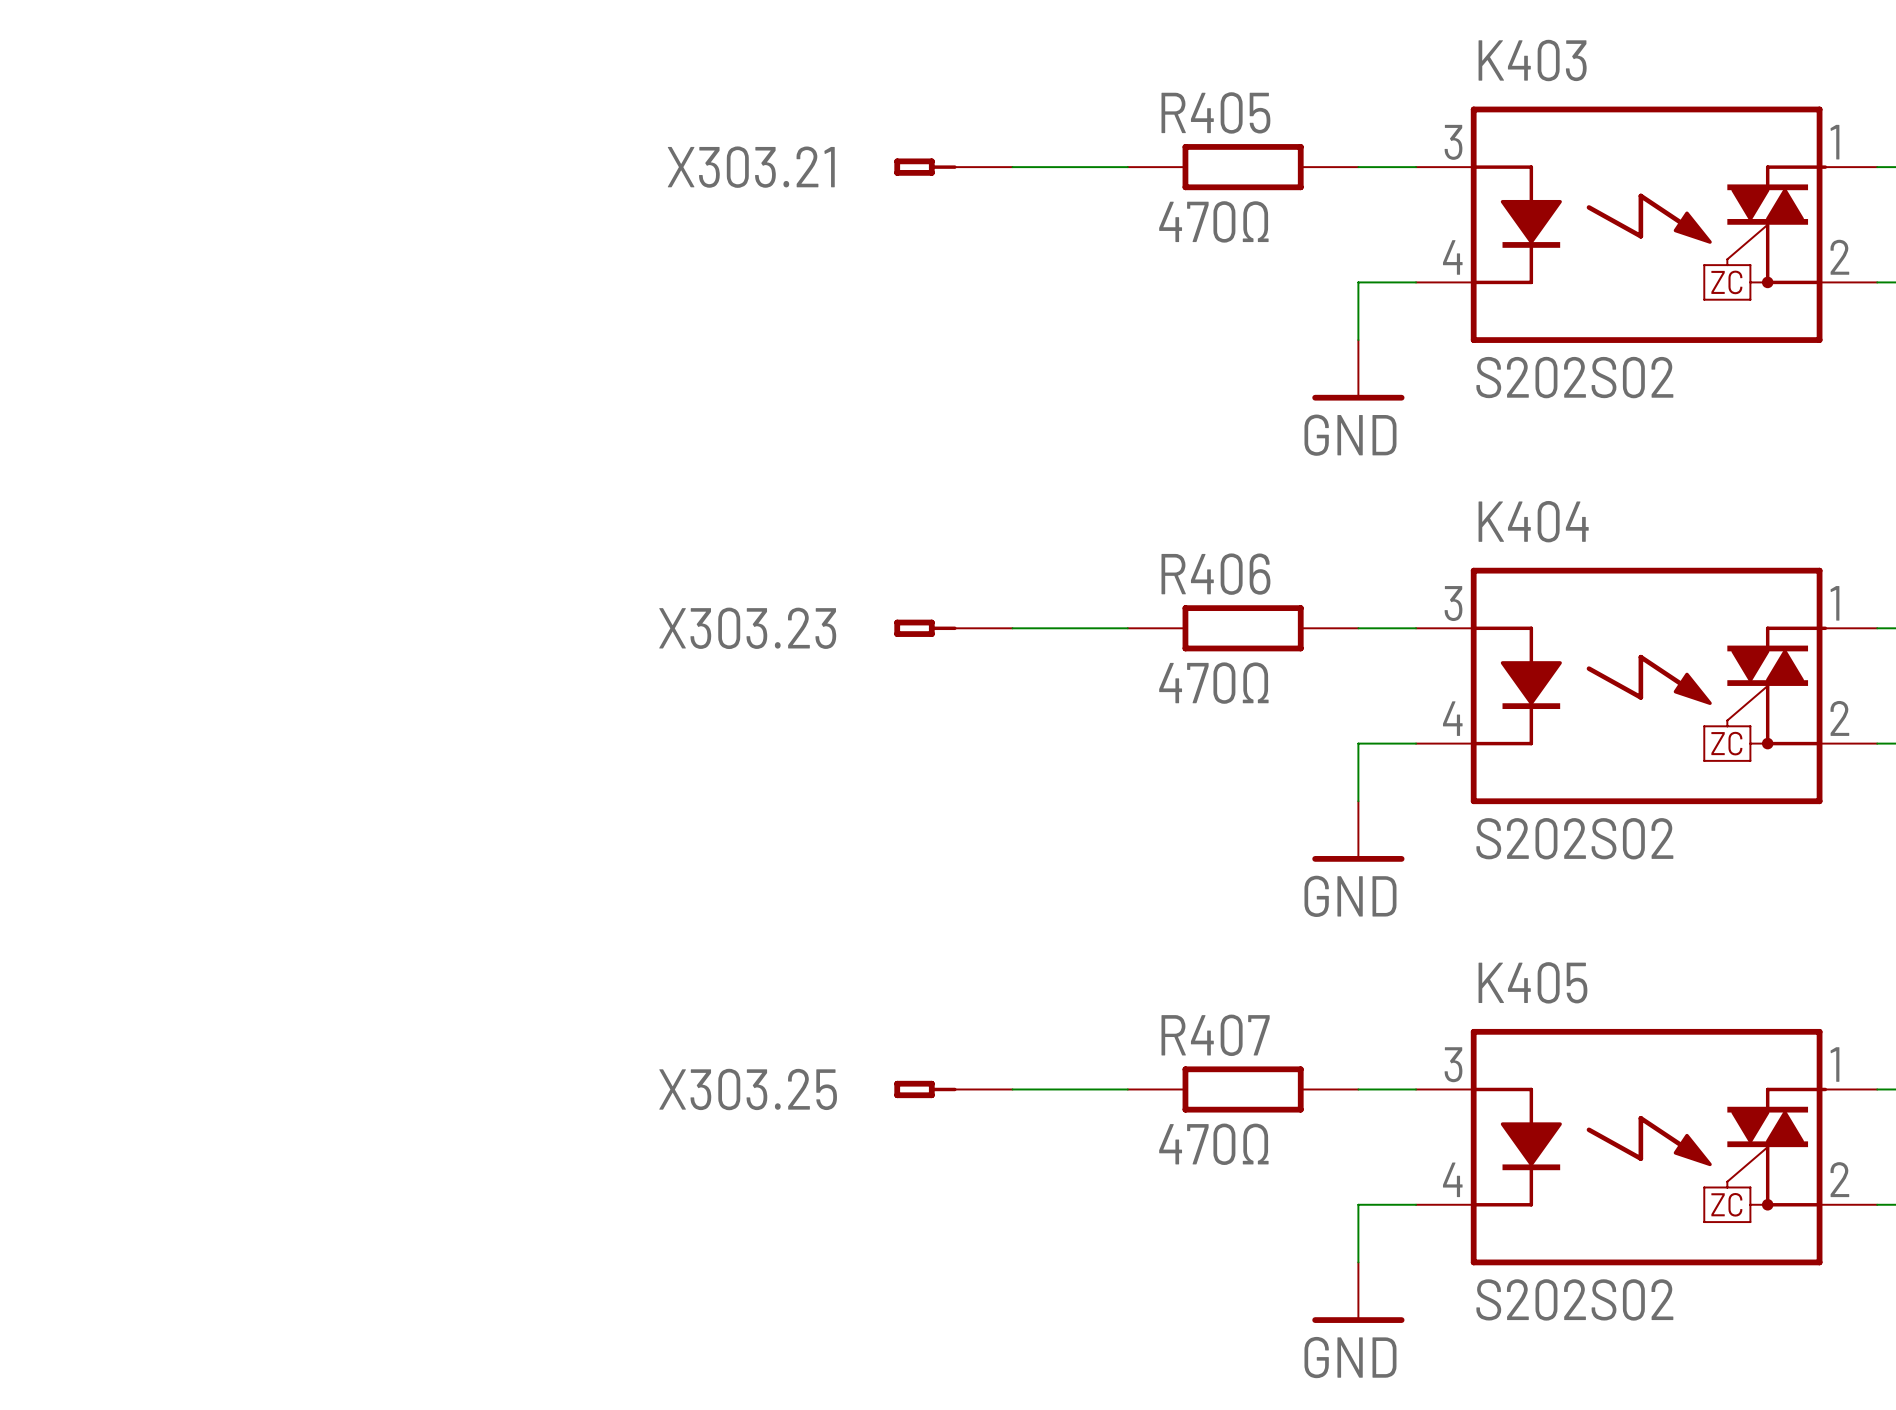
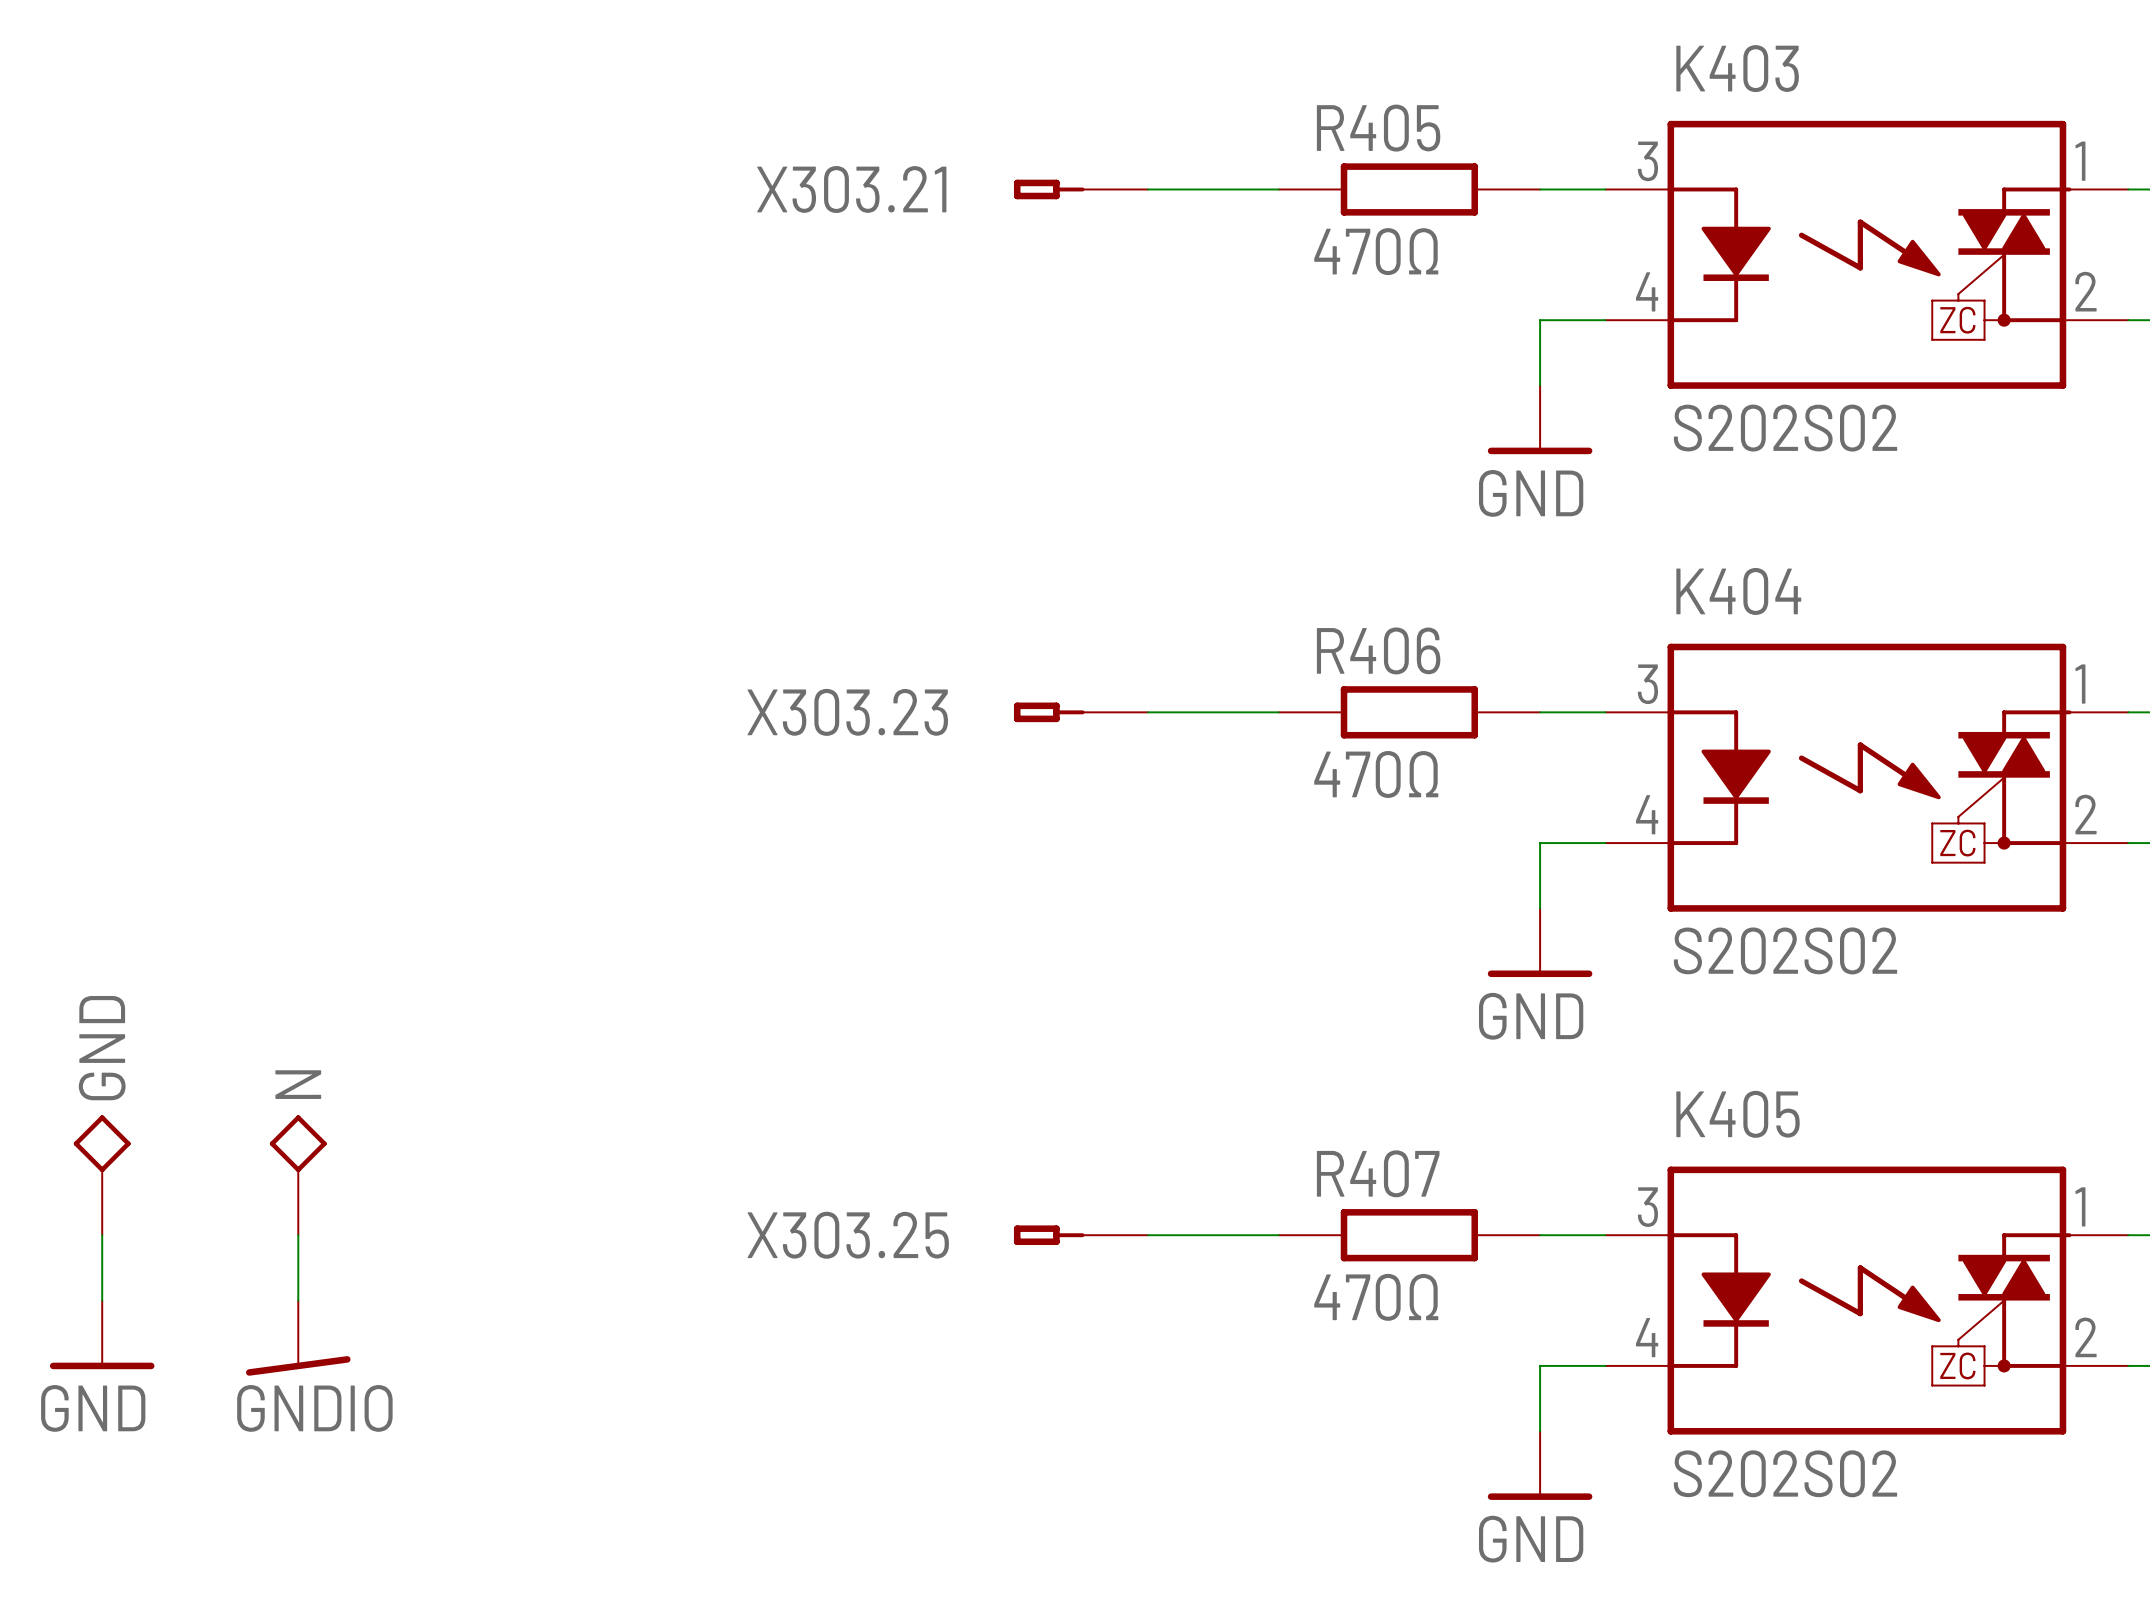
GND: none -> (102, 1175)
N: none -> (298, 1175)
wire: none -> (102, 1235) (102, 1300)
wire: none -> (298, 1235) (298, 1300)
power symbol: none -> GND (102, 1334)
power symbol: none -> GNDIO (298, 1338)

